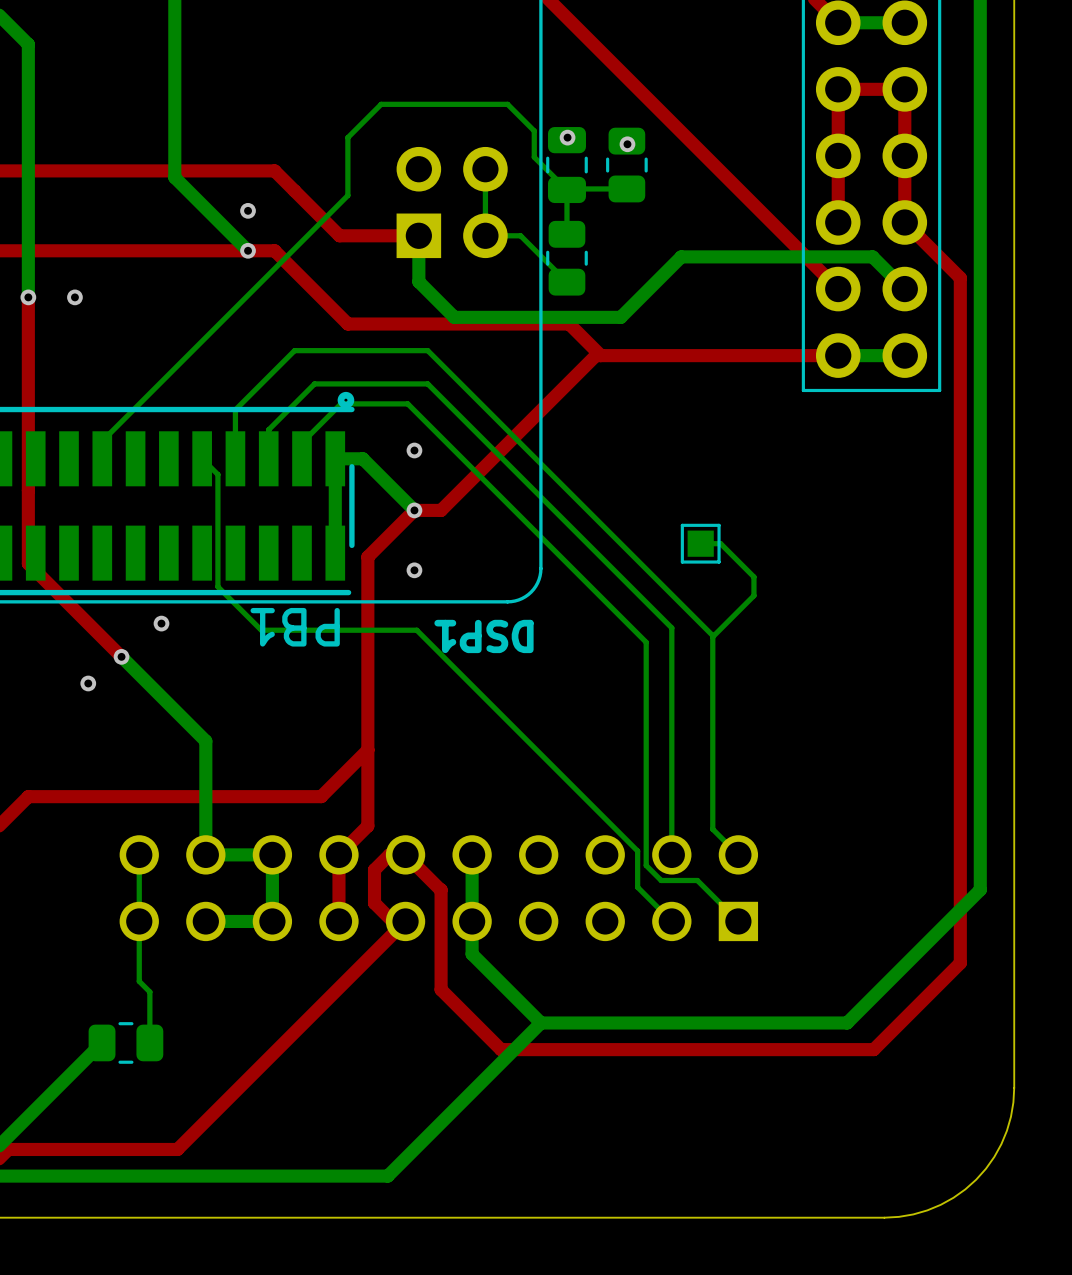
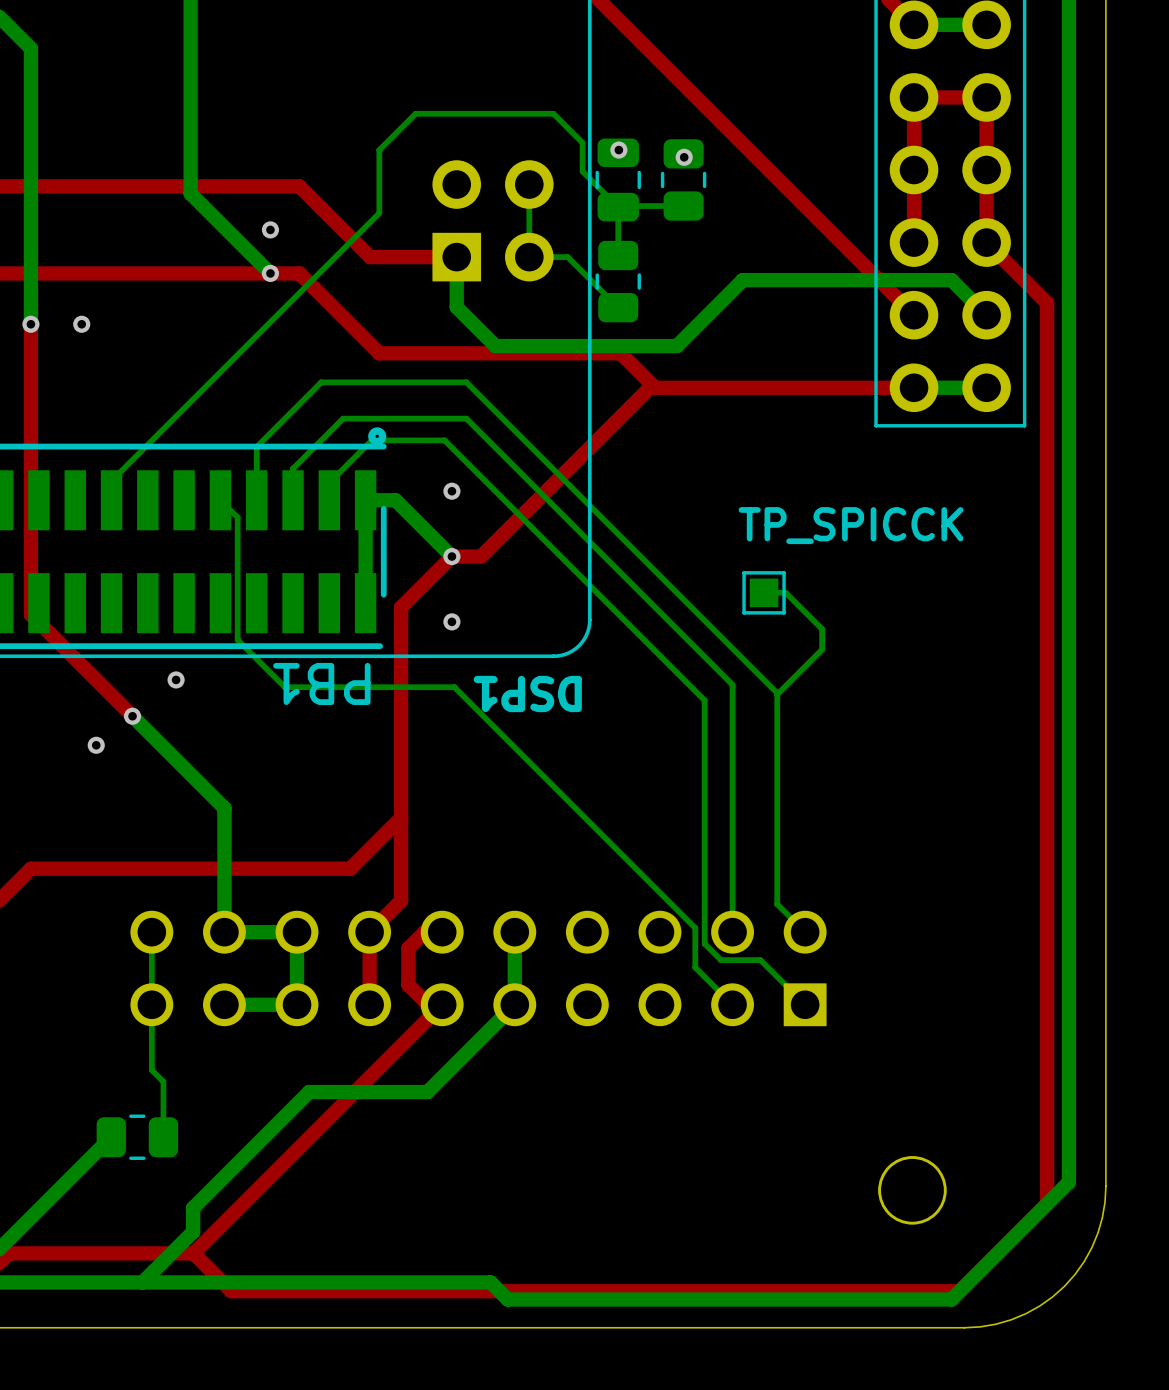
text: none -> TP_SPICCK (851, 525)
top track: (405, 854) (441, 889) (441, 989) (500, 1049) (873, 1049) (960, 963) -> (193, 1253) (231, 1291) (959, 1291) (1047, 1203) (1047, 1050)
bottom track: (980, 889) (847, 1022) (540, 1022) -> (1068, 970) (1068, 1182) (951, 1299) (507, 1299) (490, 1282) (422, 1282)
bottom track: none -> (514, 1004) (427, 1092) (309, 1092) (193, 1208) (193, 1231) (142, 1282)
bottom track: (472, 932) (472, 954) (540, 1022) -> none
bottom track: (540, 1022) (387, 1176) -> none
round board edge: none -> [878, 1156, 947, 1225]

